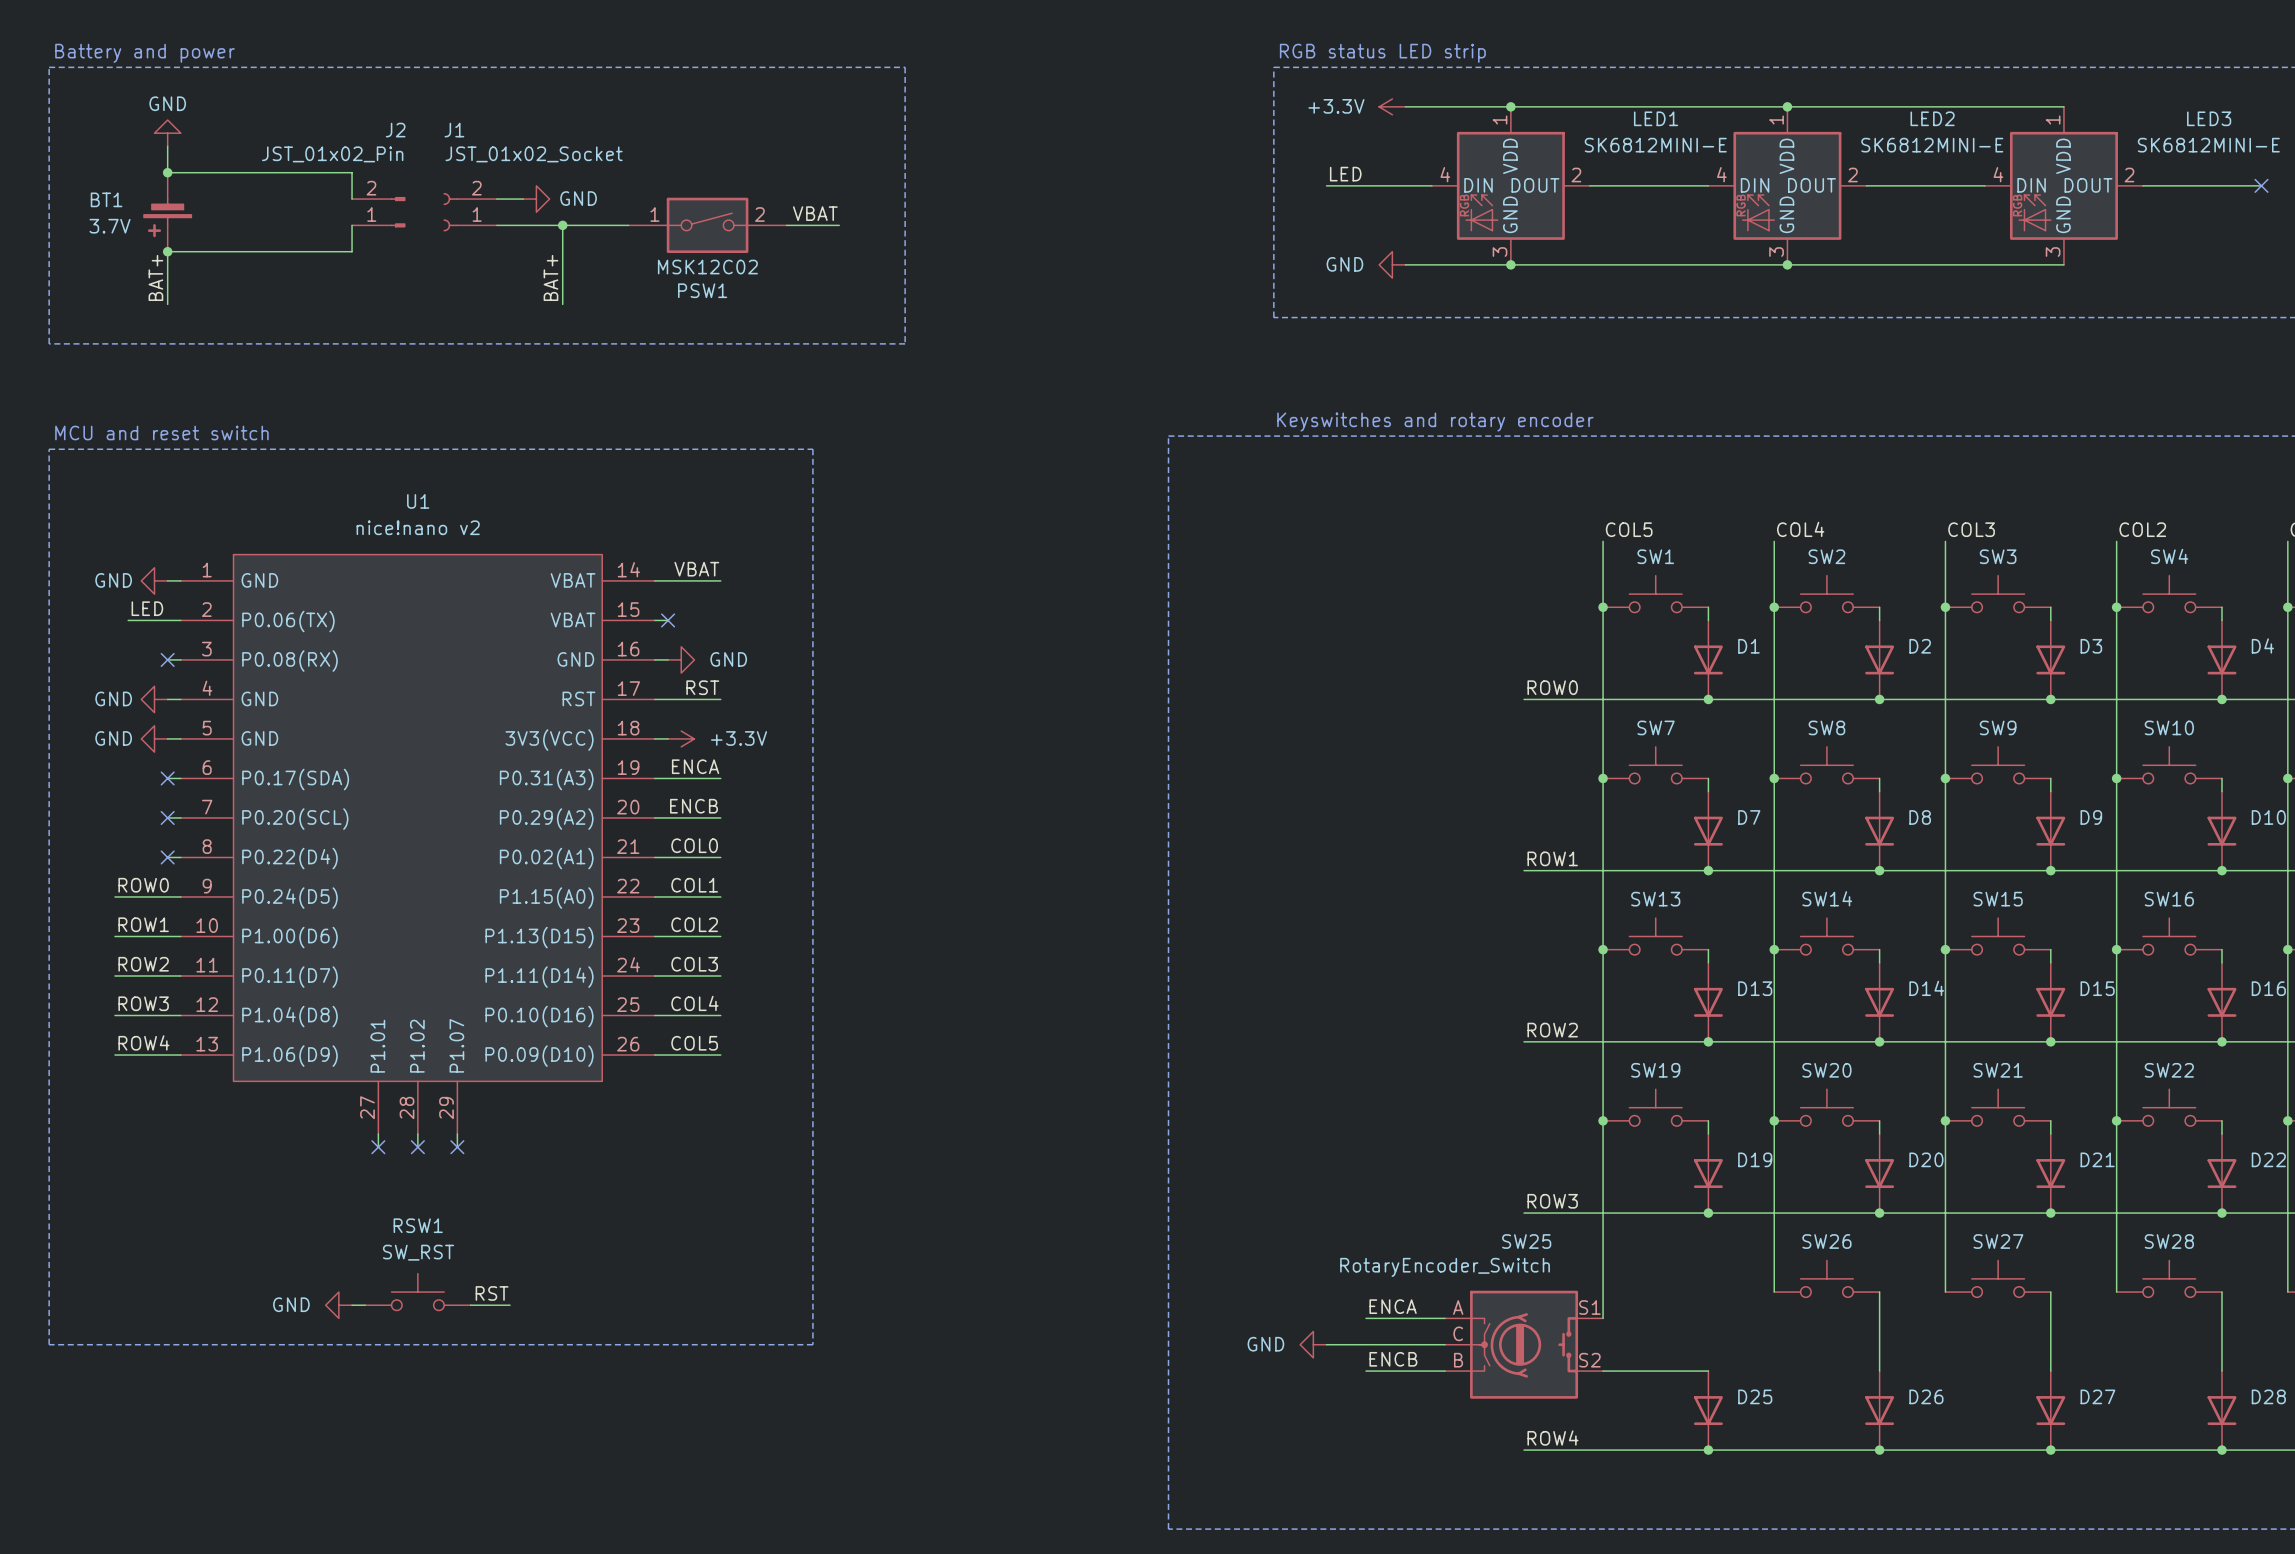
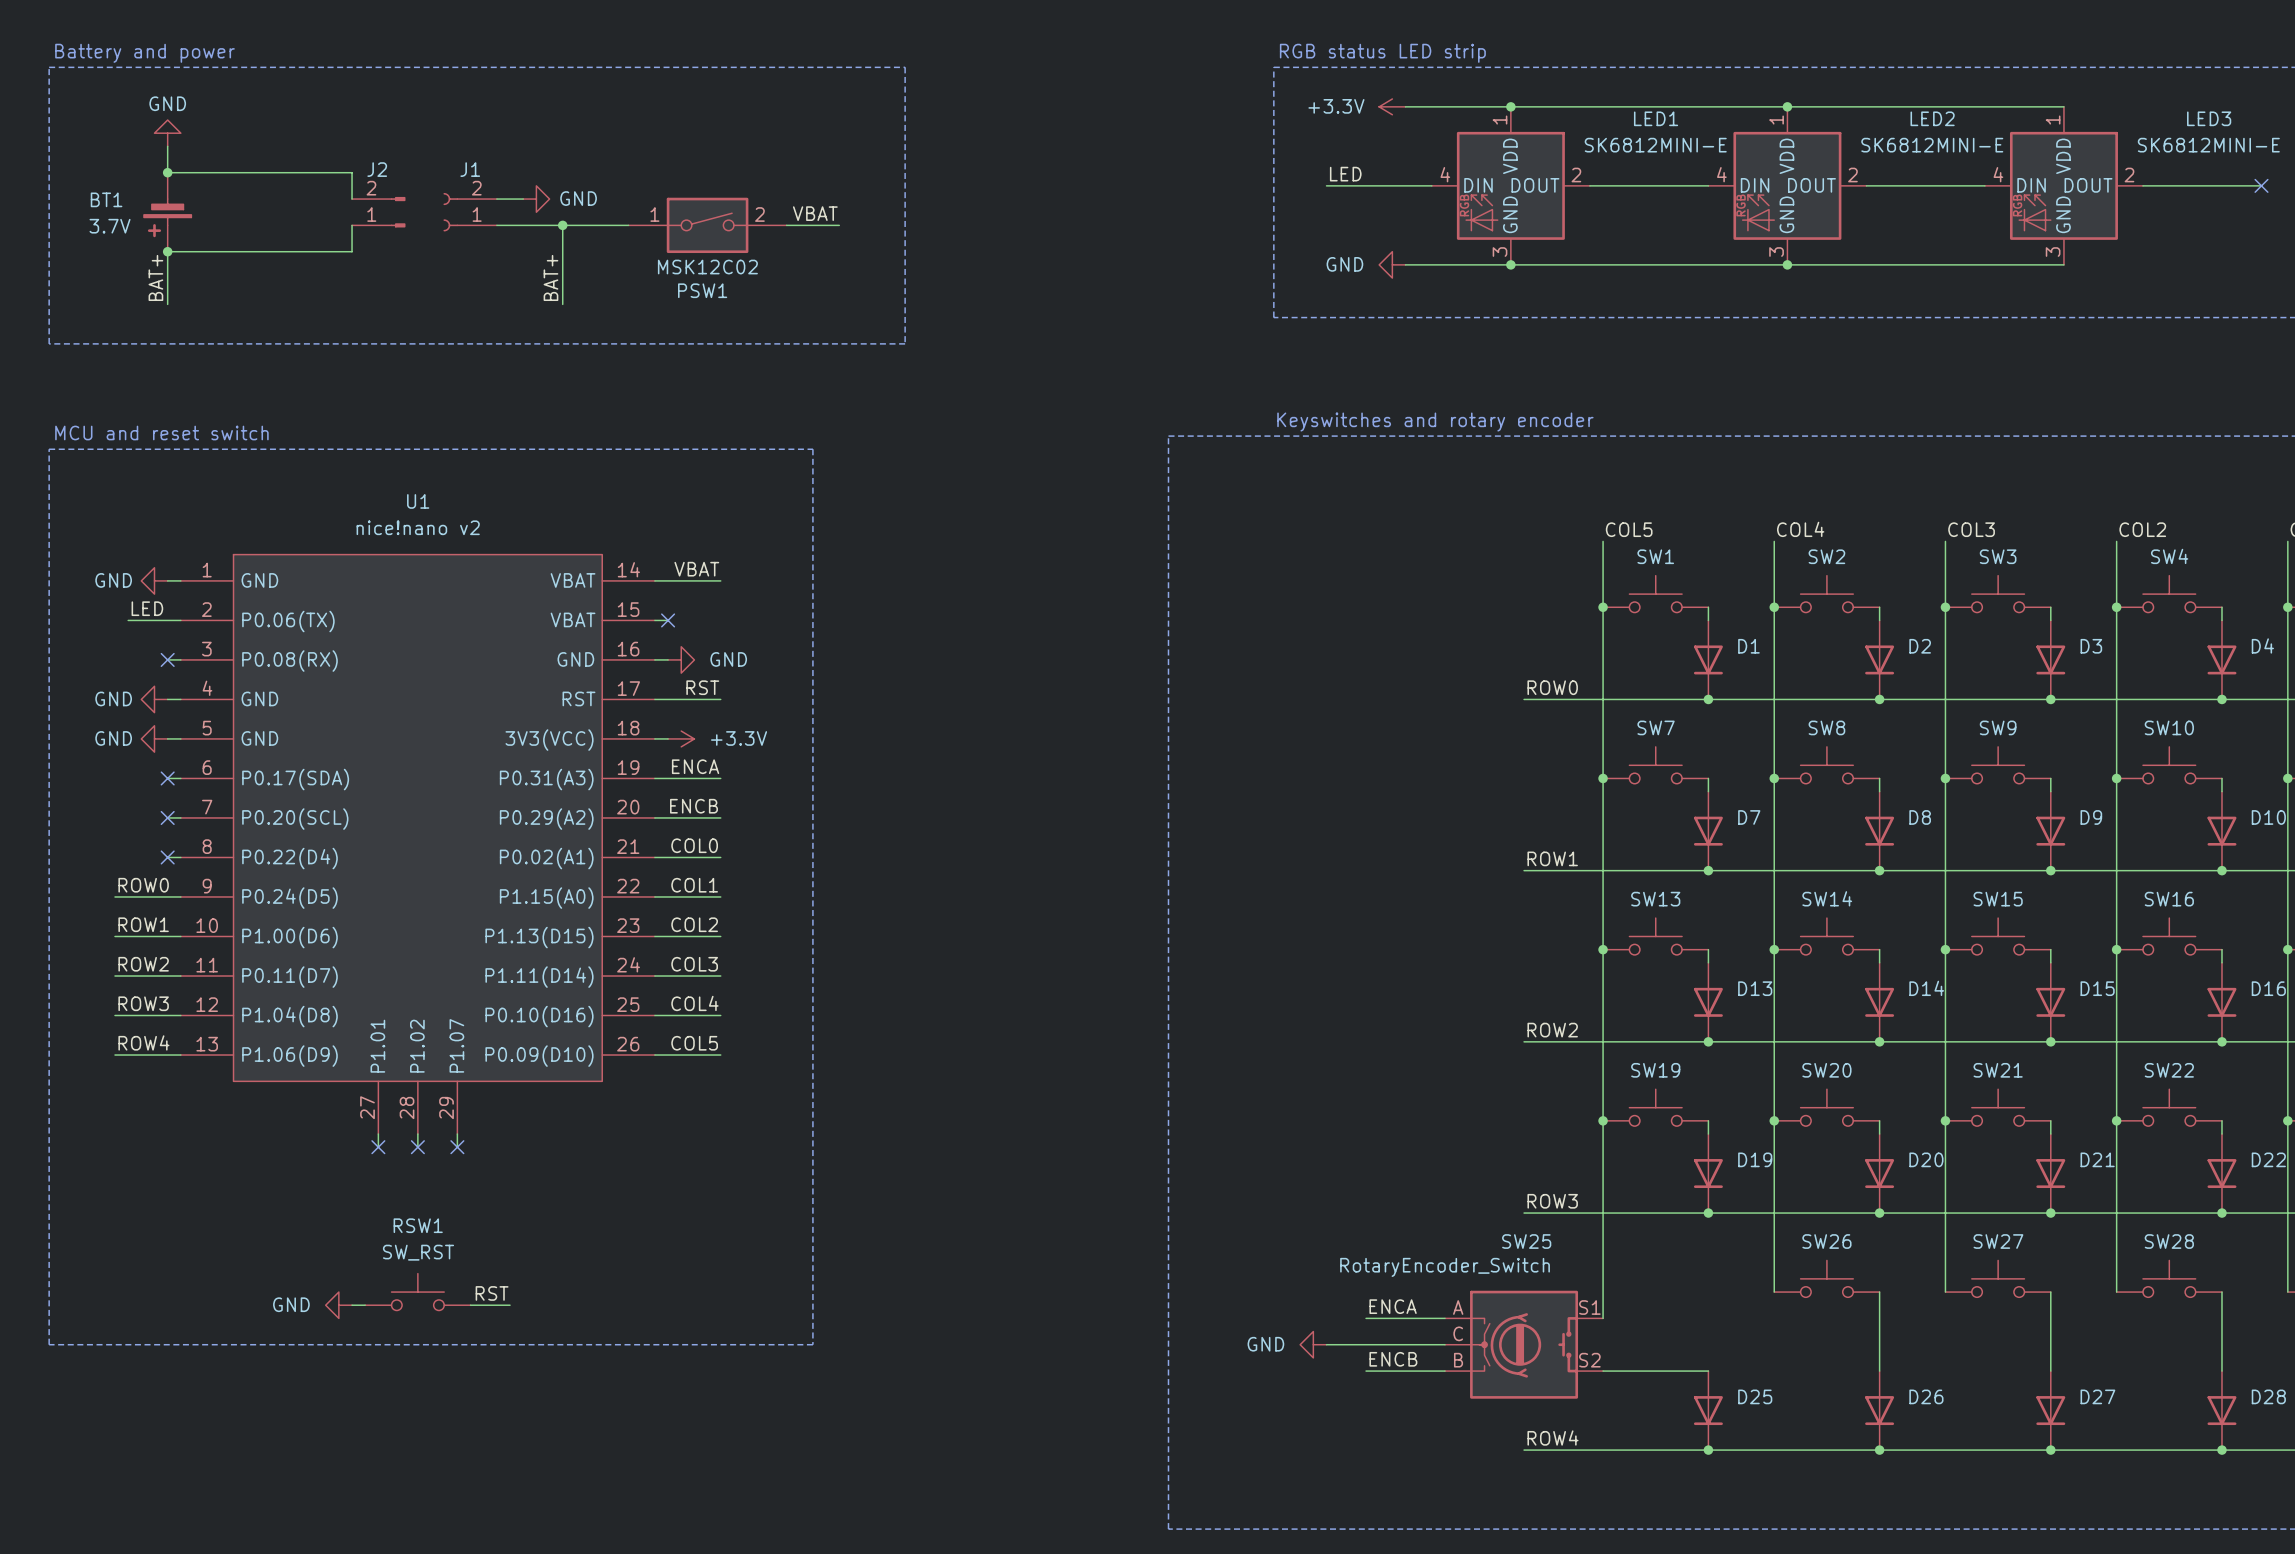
J2 name position: J2 (395, 130) -> J2 (377, 169)
J1 name position: J1 (454, 130) -> J1 (470, 169)
J2 value: JST_01x02_Pin (332, 154) -> none
J1 value: JST_01x02_Socket (534, 154) -> none

